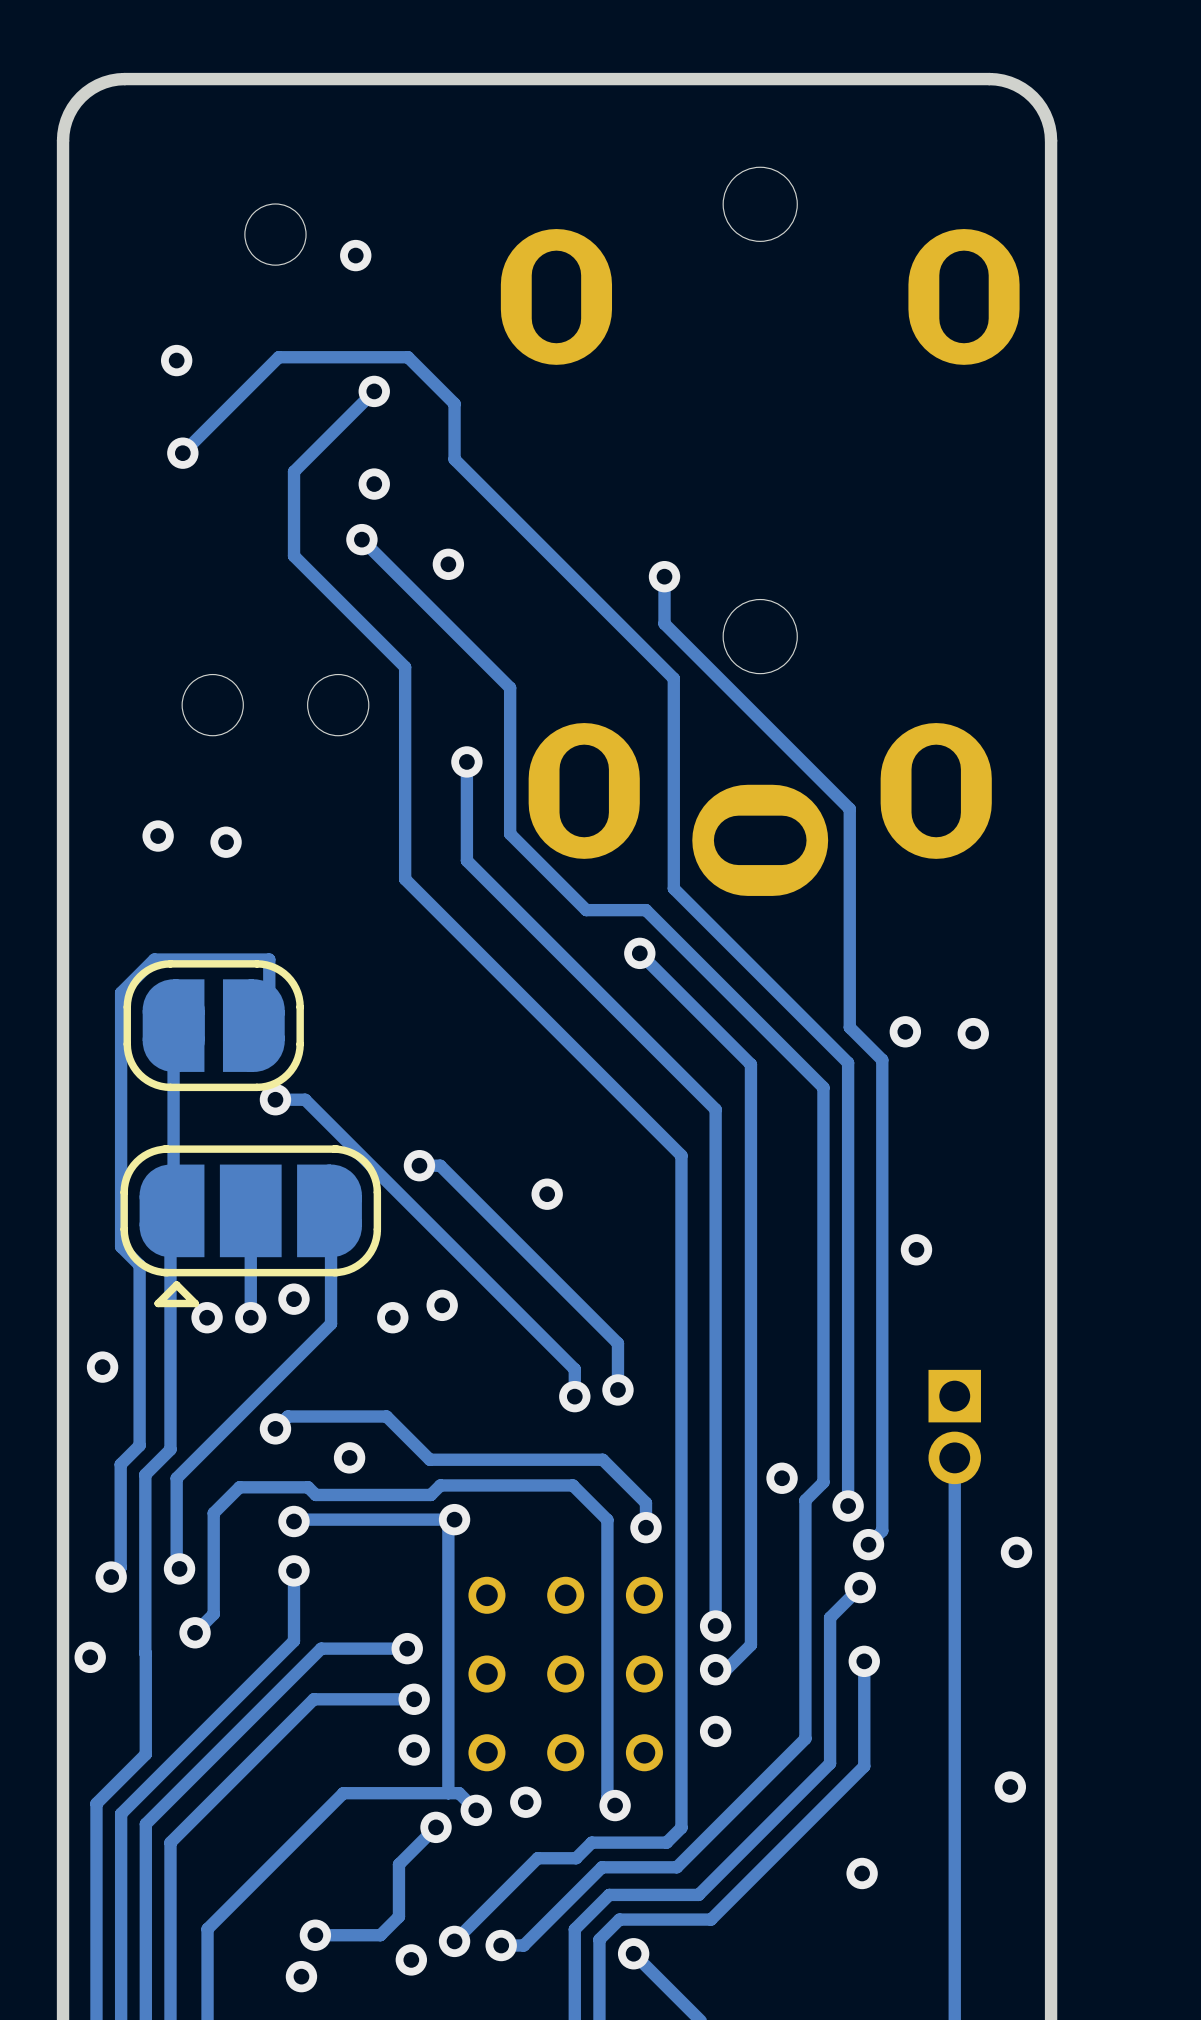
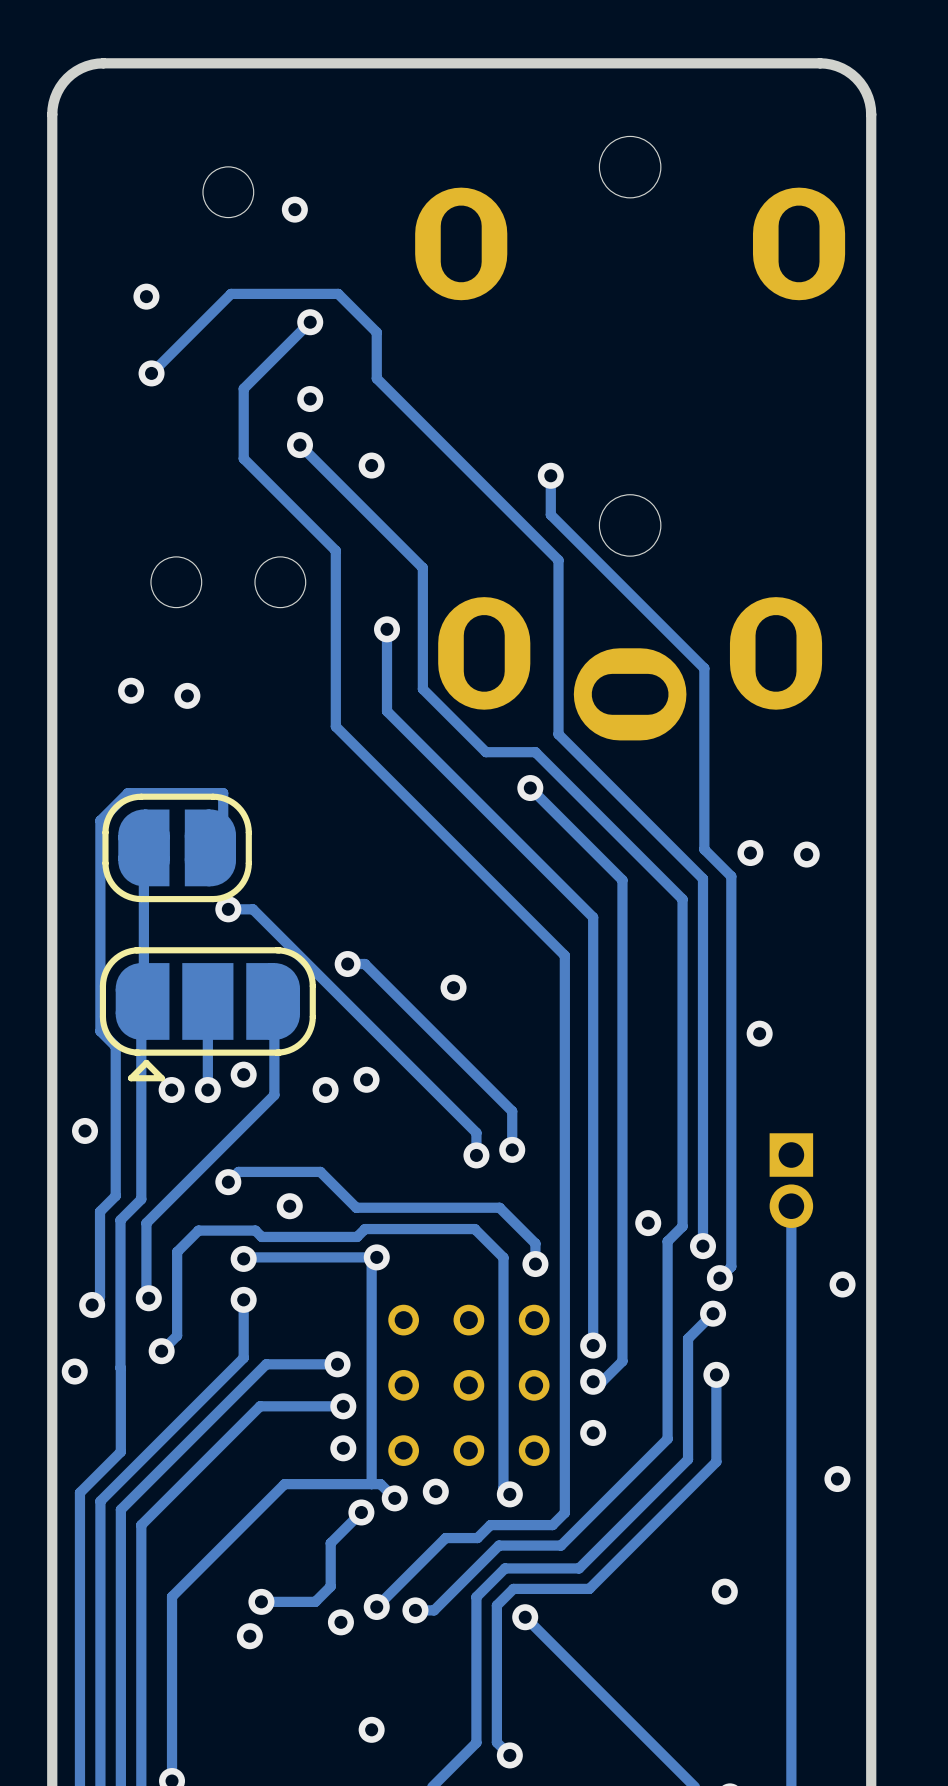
via position: (862, 1873) -> (724, 1591)

